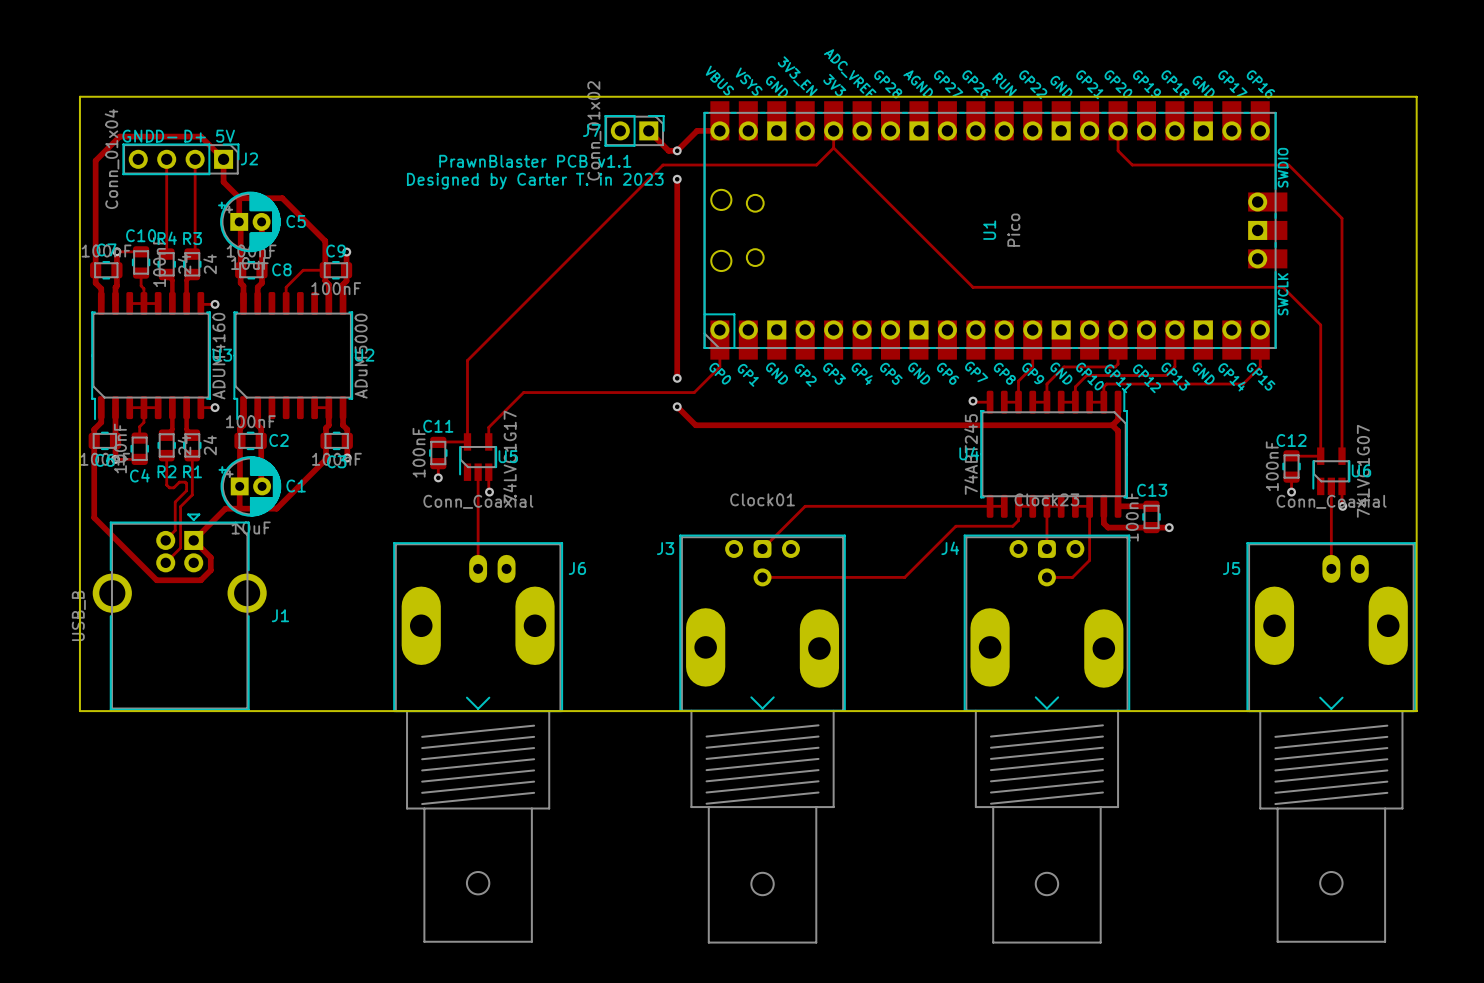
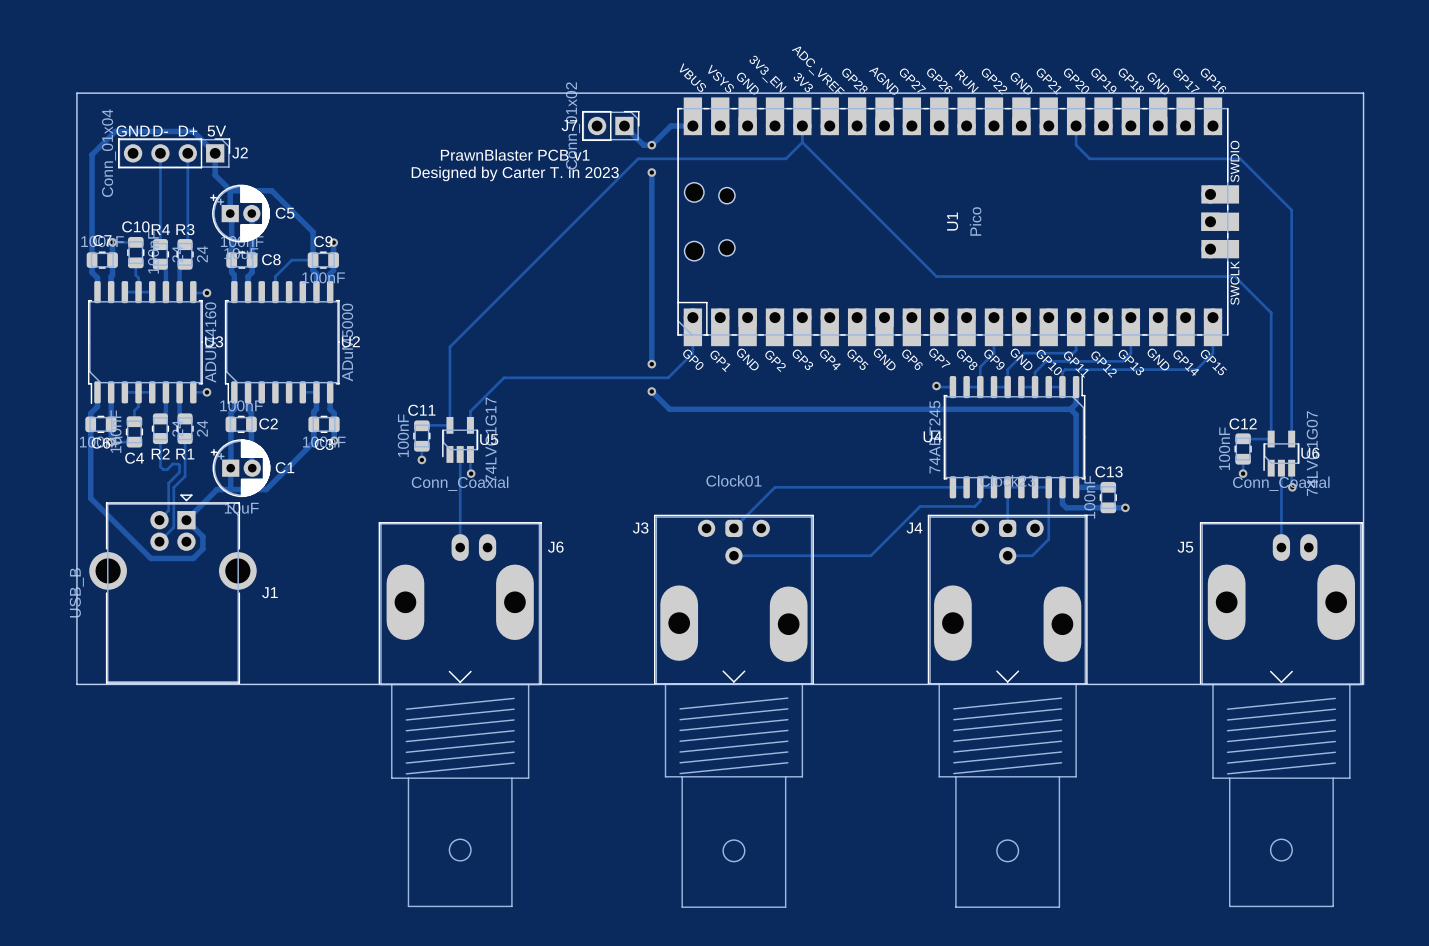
text: PrawnBlaster PCB v1.1 (535, 161) -> PrawnBlaster PCB v1 (515, 155)

